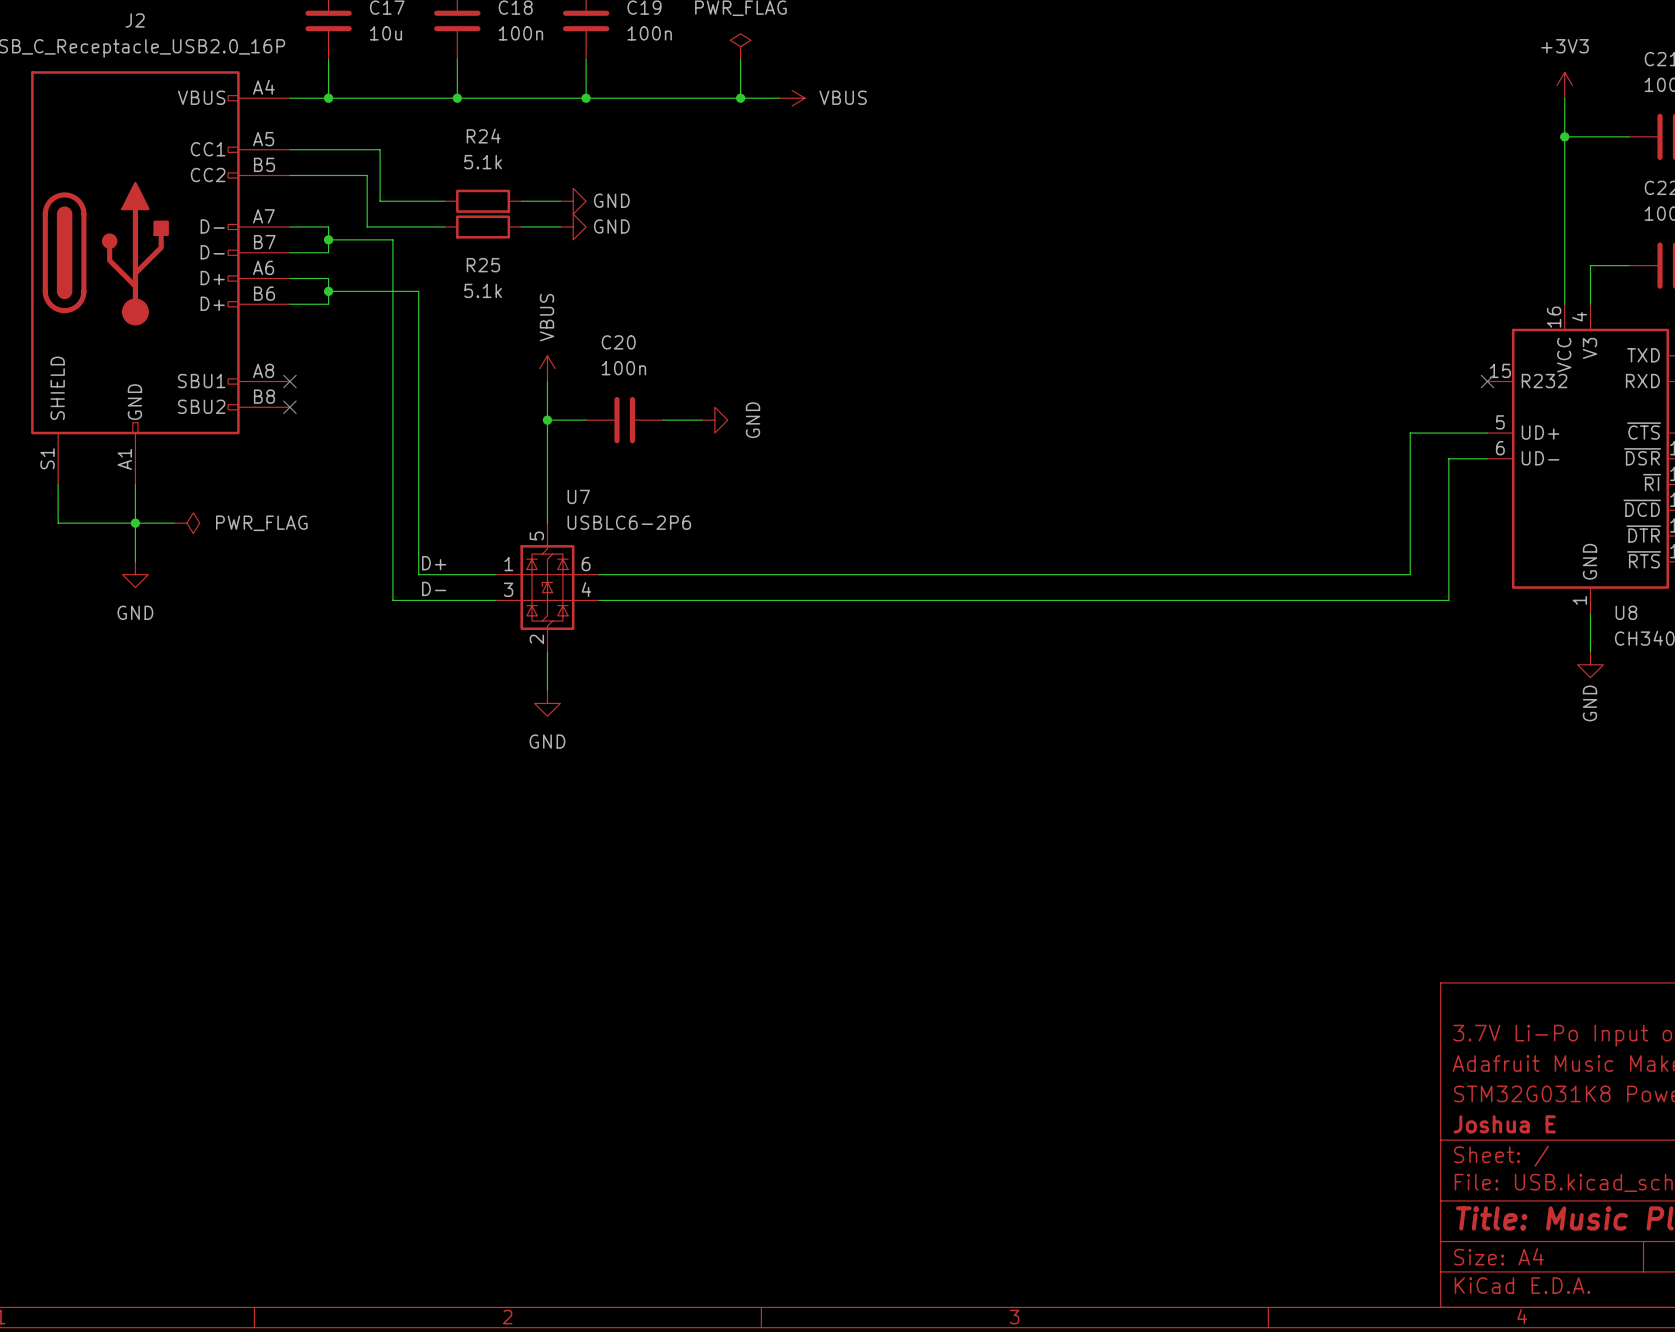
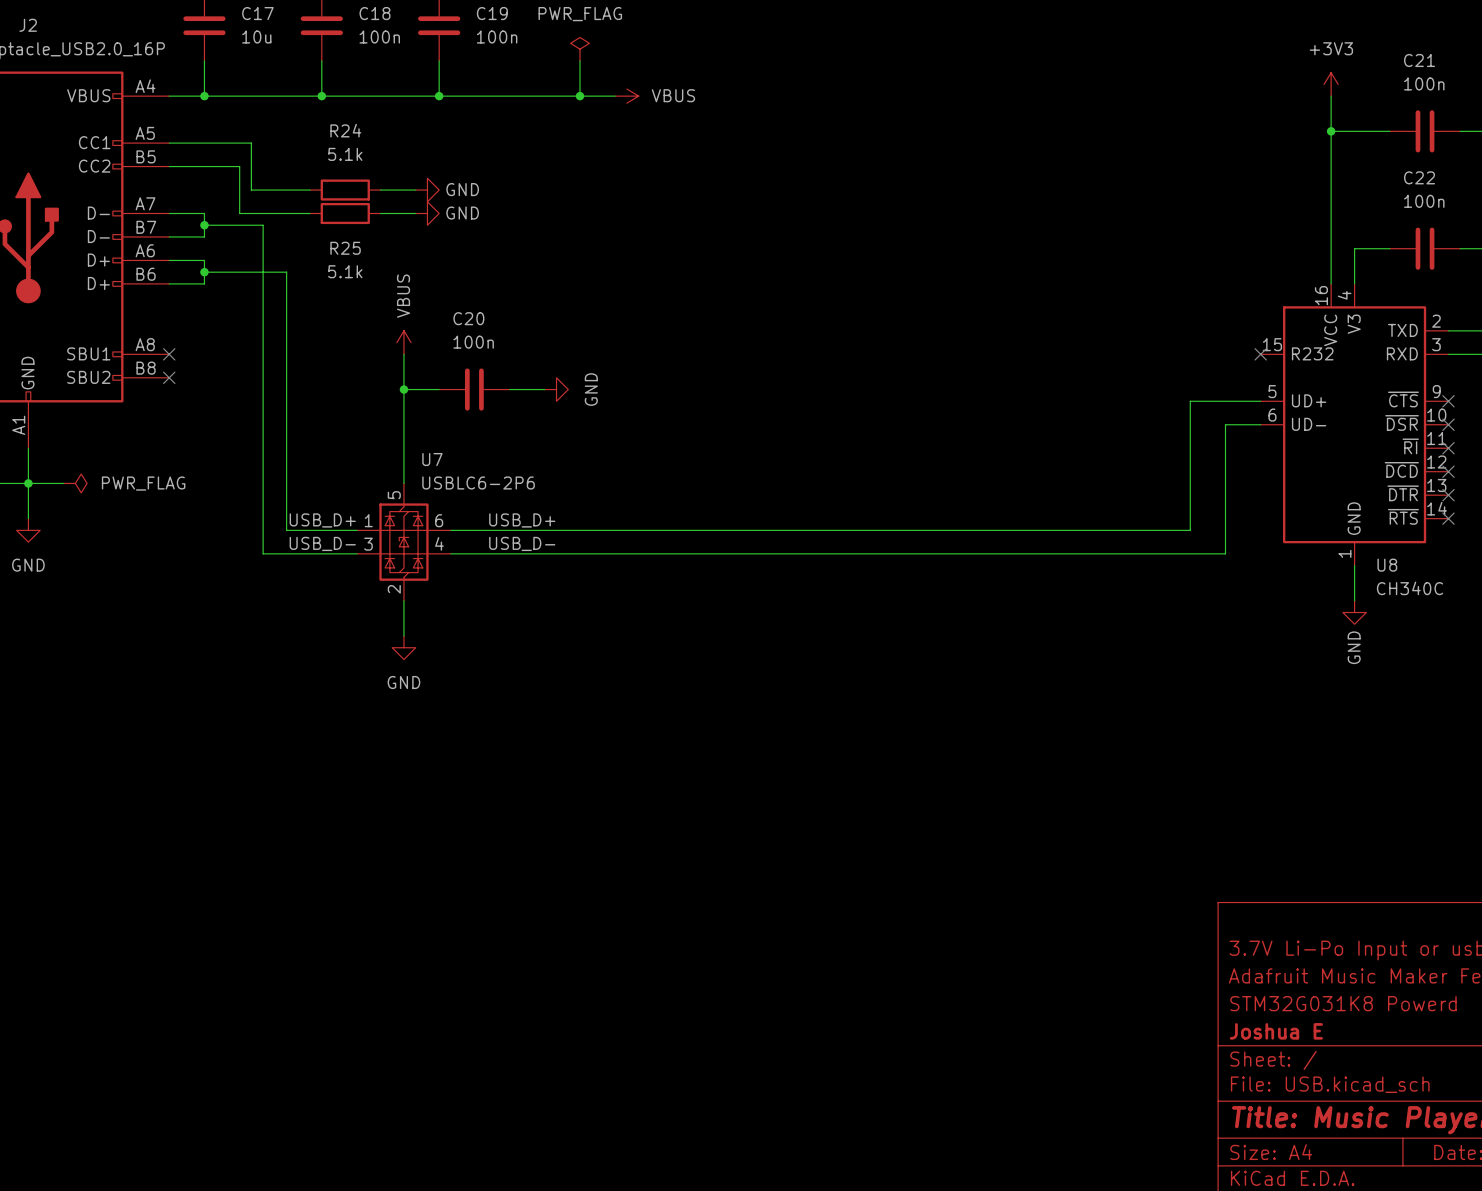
label: D+ (434, 563) -> USB_D+ (322, 520)
label: none -> USB_D+ (522, 520)
label: D- (434, 588) -> USB_D- (322, 543)
label: none -> USB_D- (522, 543)

